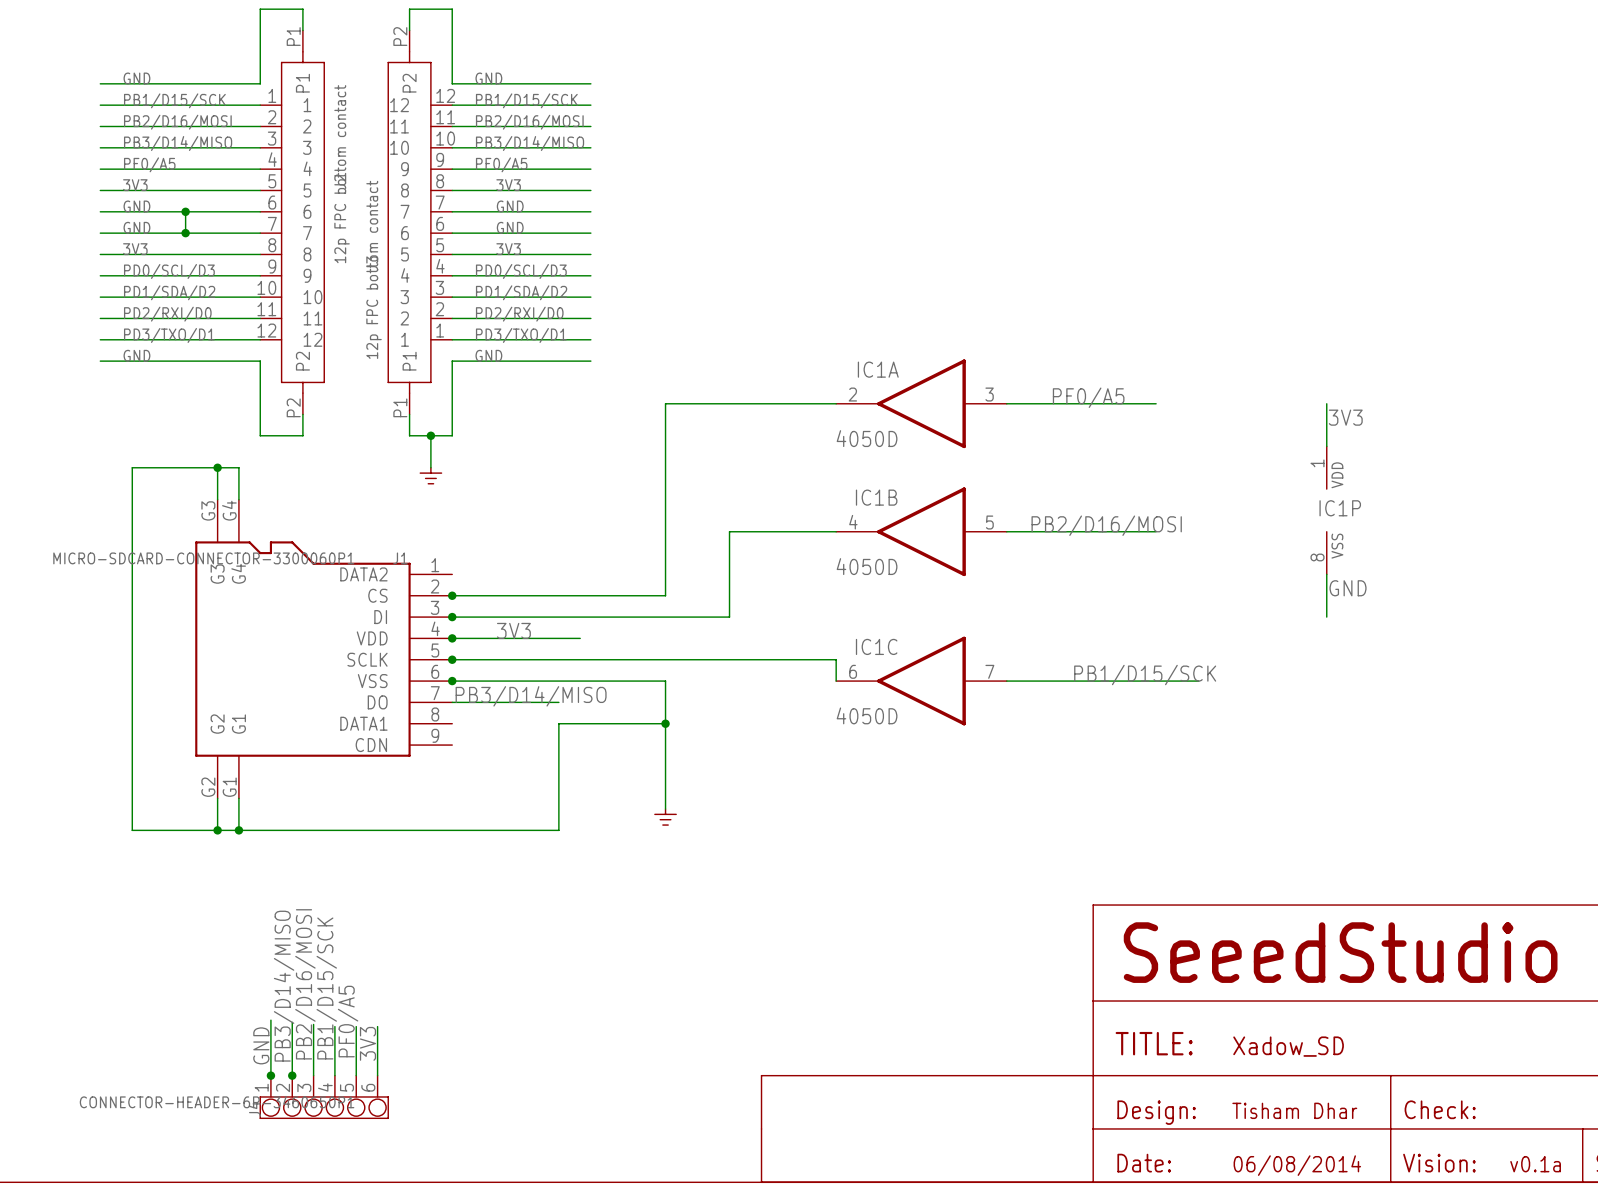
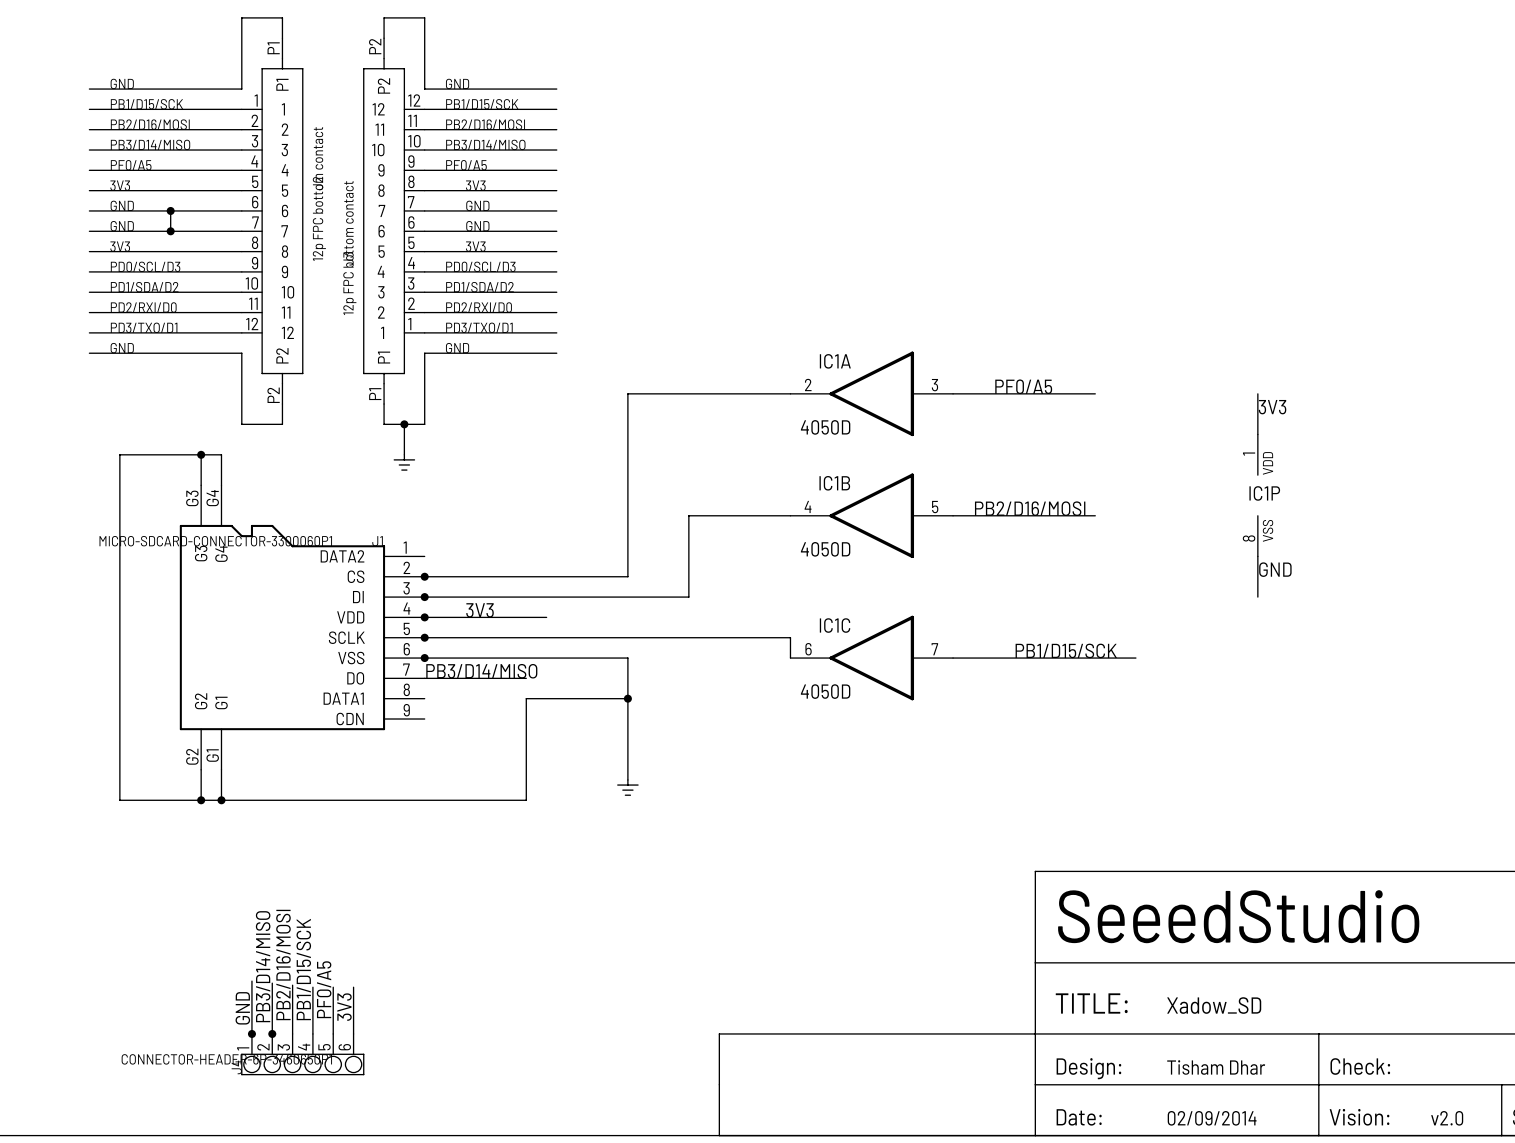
text: v0.1a (1535, 1164) -> v2.0 (1447, 1118)
text: 06/08/2014 (1297, 1165) -> 02/09/2014 (1212, 1118)

